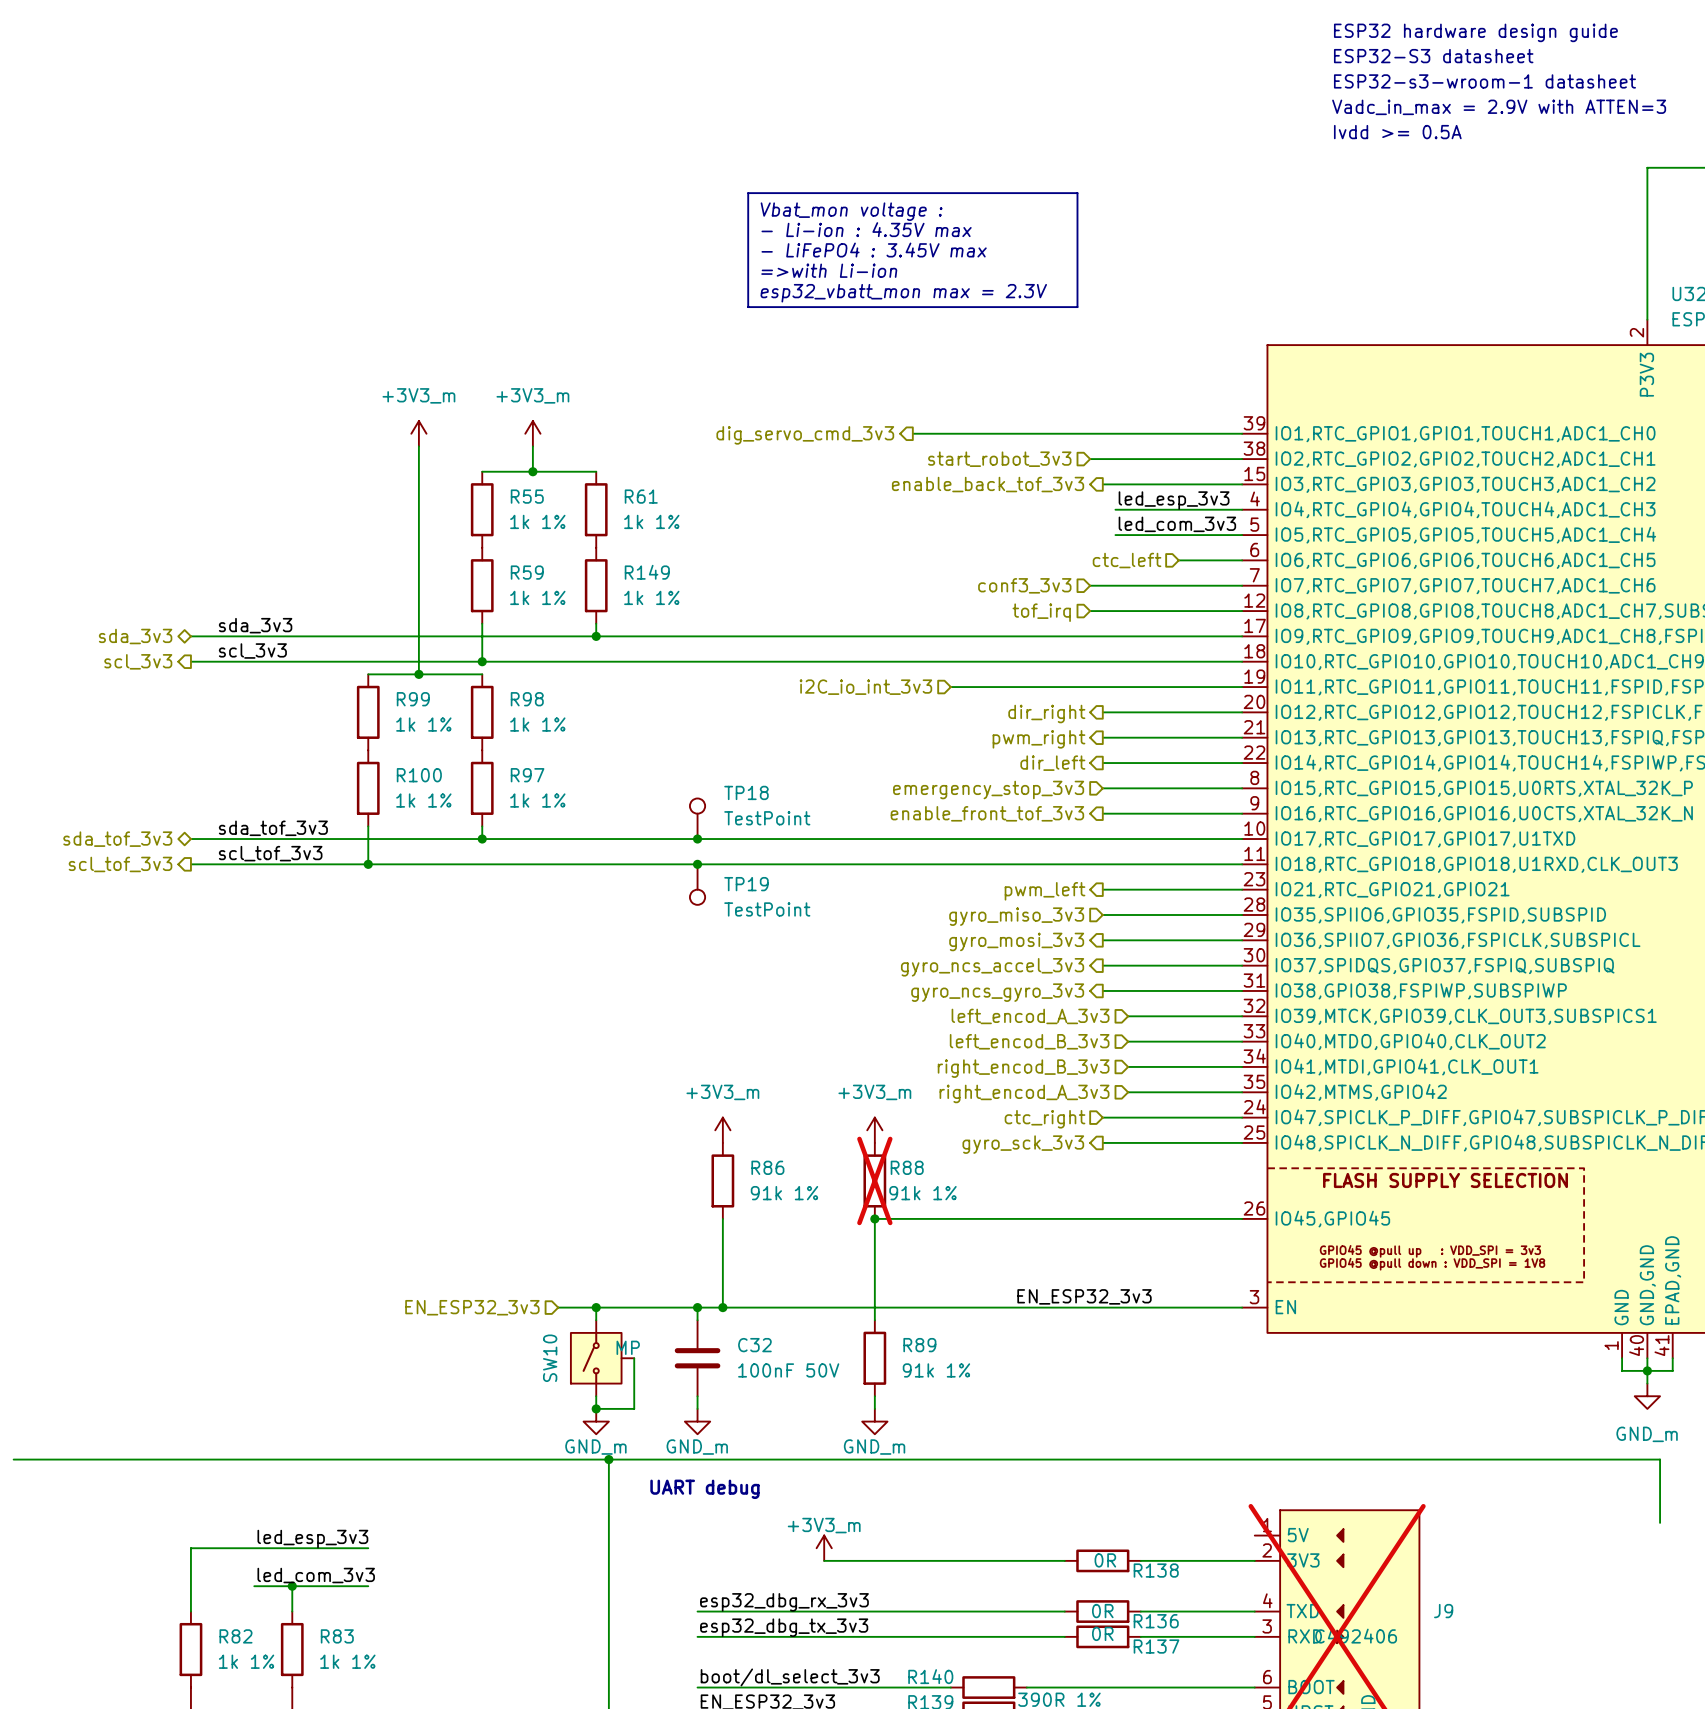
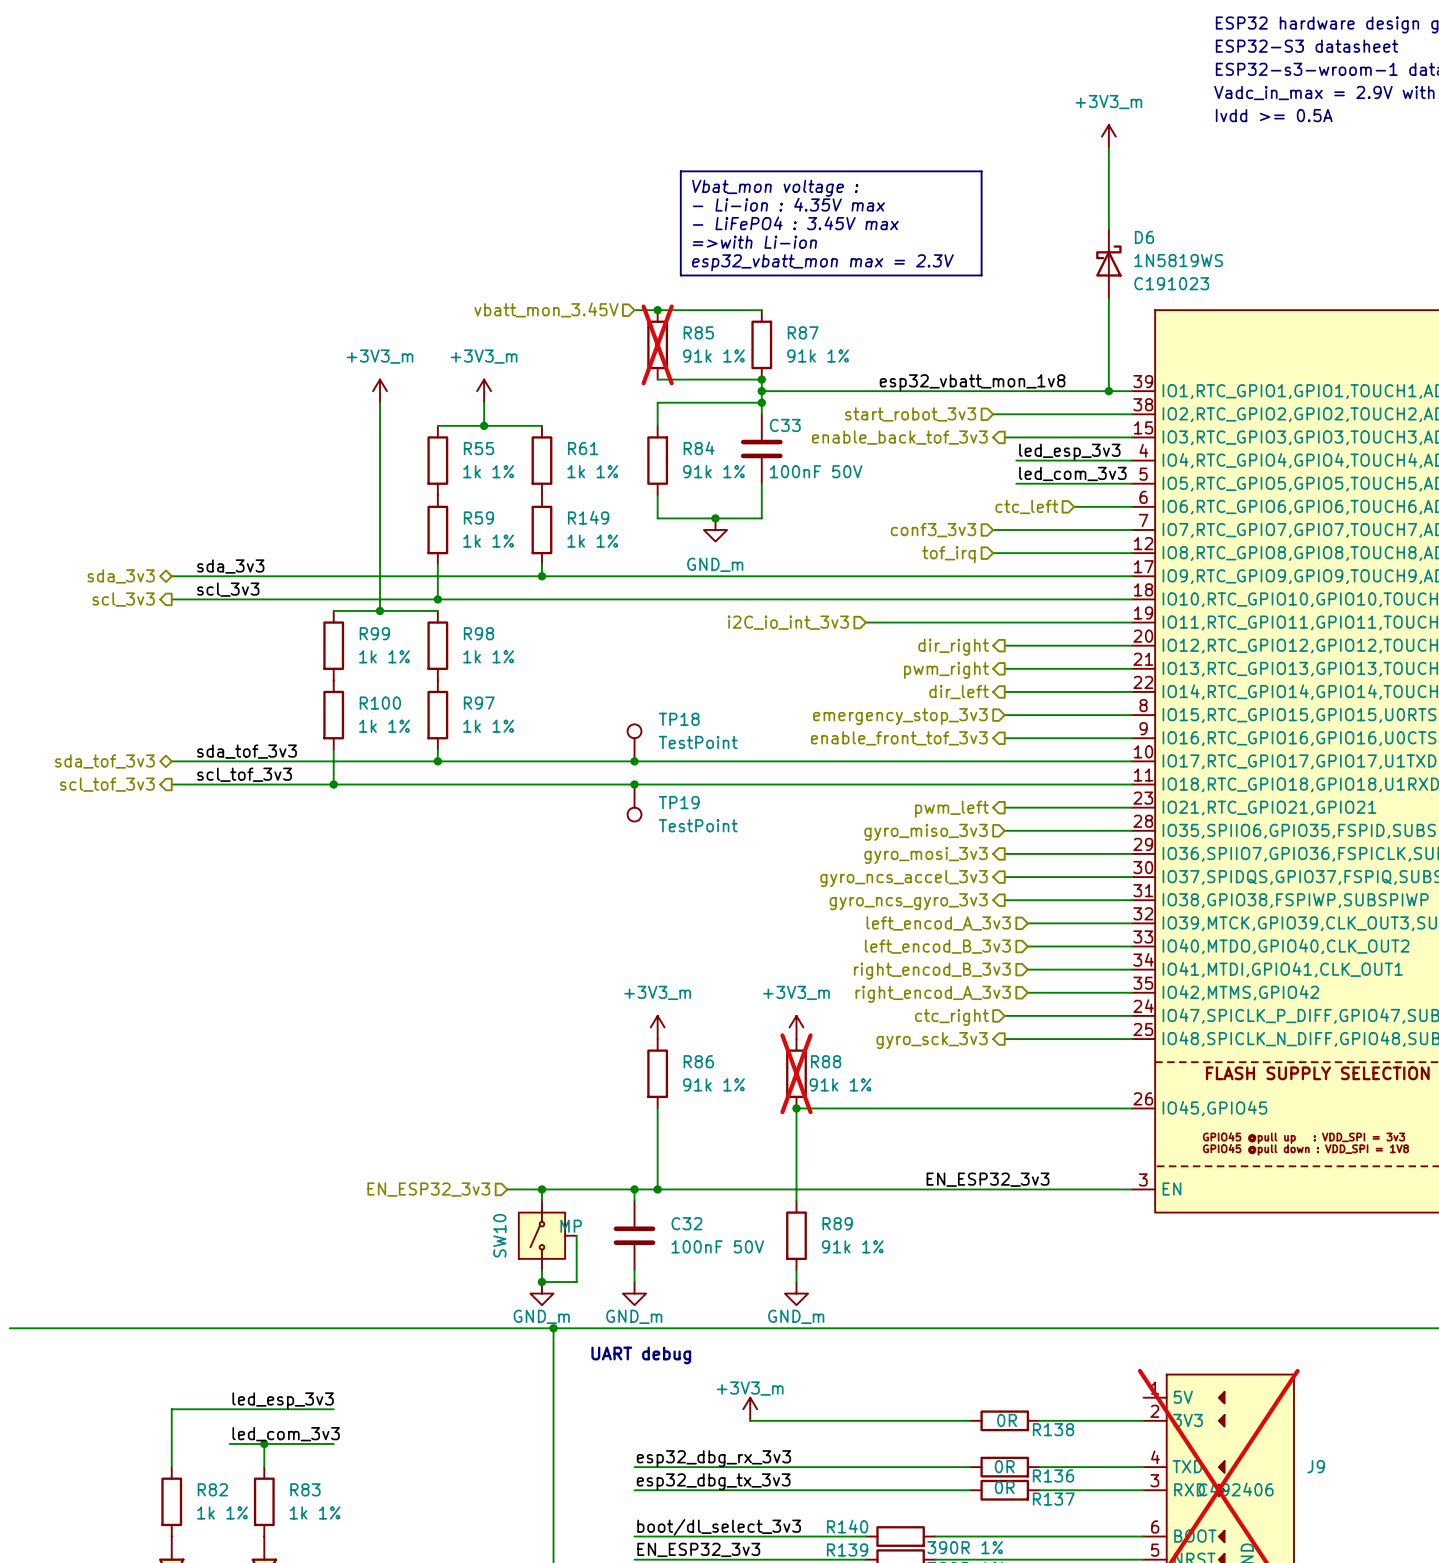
power symbol: none -> +3V3_m (1108, 136)
wire: none -> (1108, 148) (1108, 229)
D6: none -> 1N5819WS (1108, 263)
wire: none -> (1108, 298) (1108, 391)
hierarchical label: none -> vbatt_mon_3.45V (546, 310)
wire: none -> (634, 310) (761, 310)
junction: none -> (657, 310)
R85: none -> 91k 1% (657, 344)
R87: none -> 91k 1% (761, 344)
wire: none -> (657, 379) (761, 379) (761, 414)
junction: none -> (761, 379)
label: none -> esp32_vbatt_mon_1v8 (972, 382)
wire: none -> (761, 391) (831, 391)
junction: none -> (761, 391)
junction: none -> (1108, 391)
hierarchical label: dig_servo_cmd_3v3 (805, 435) -> none
wire: none -> (761, 402) (657, 402) (657, 425)
junction: none -> (761, 402)
C33: none -> 100nF 50V (761, 449)
R84: none -> 91k 1% (657, 460)
wire: none -> (761, 483) (761, 518) (657, 518) (657, 495)
junction: none -> (715, 518)
power symbol: none -> GND_m (715, 529)

